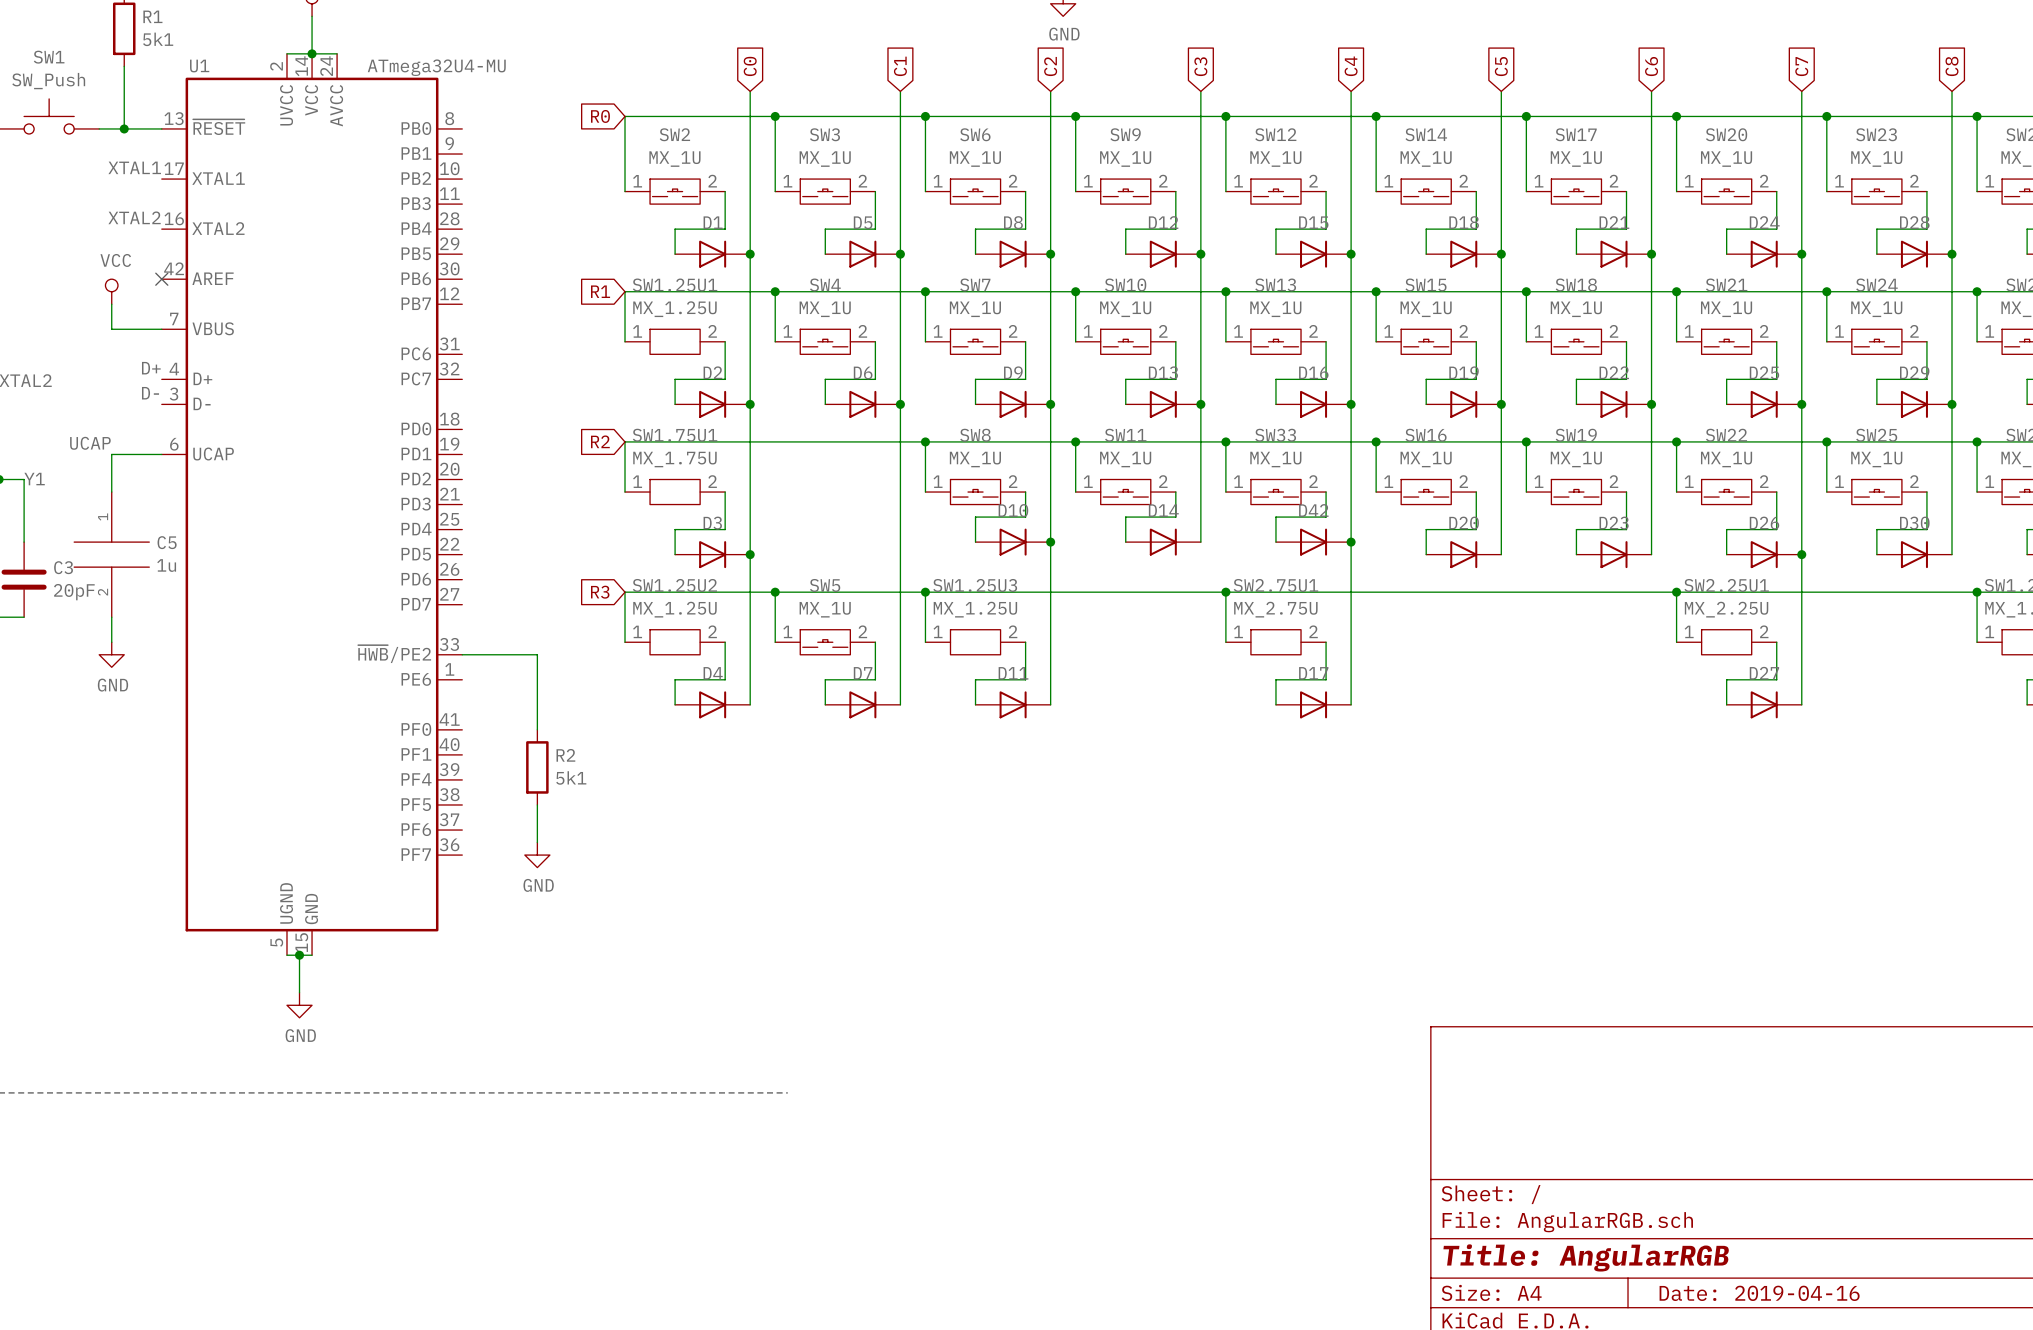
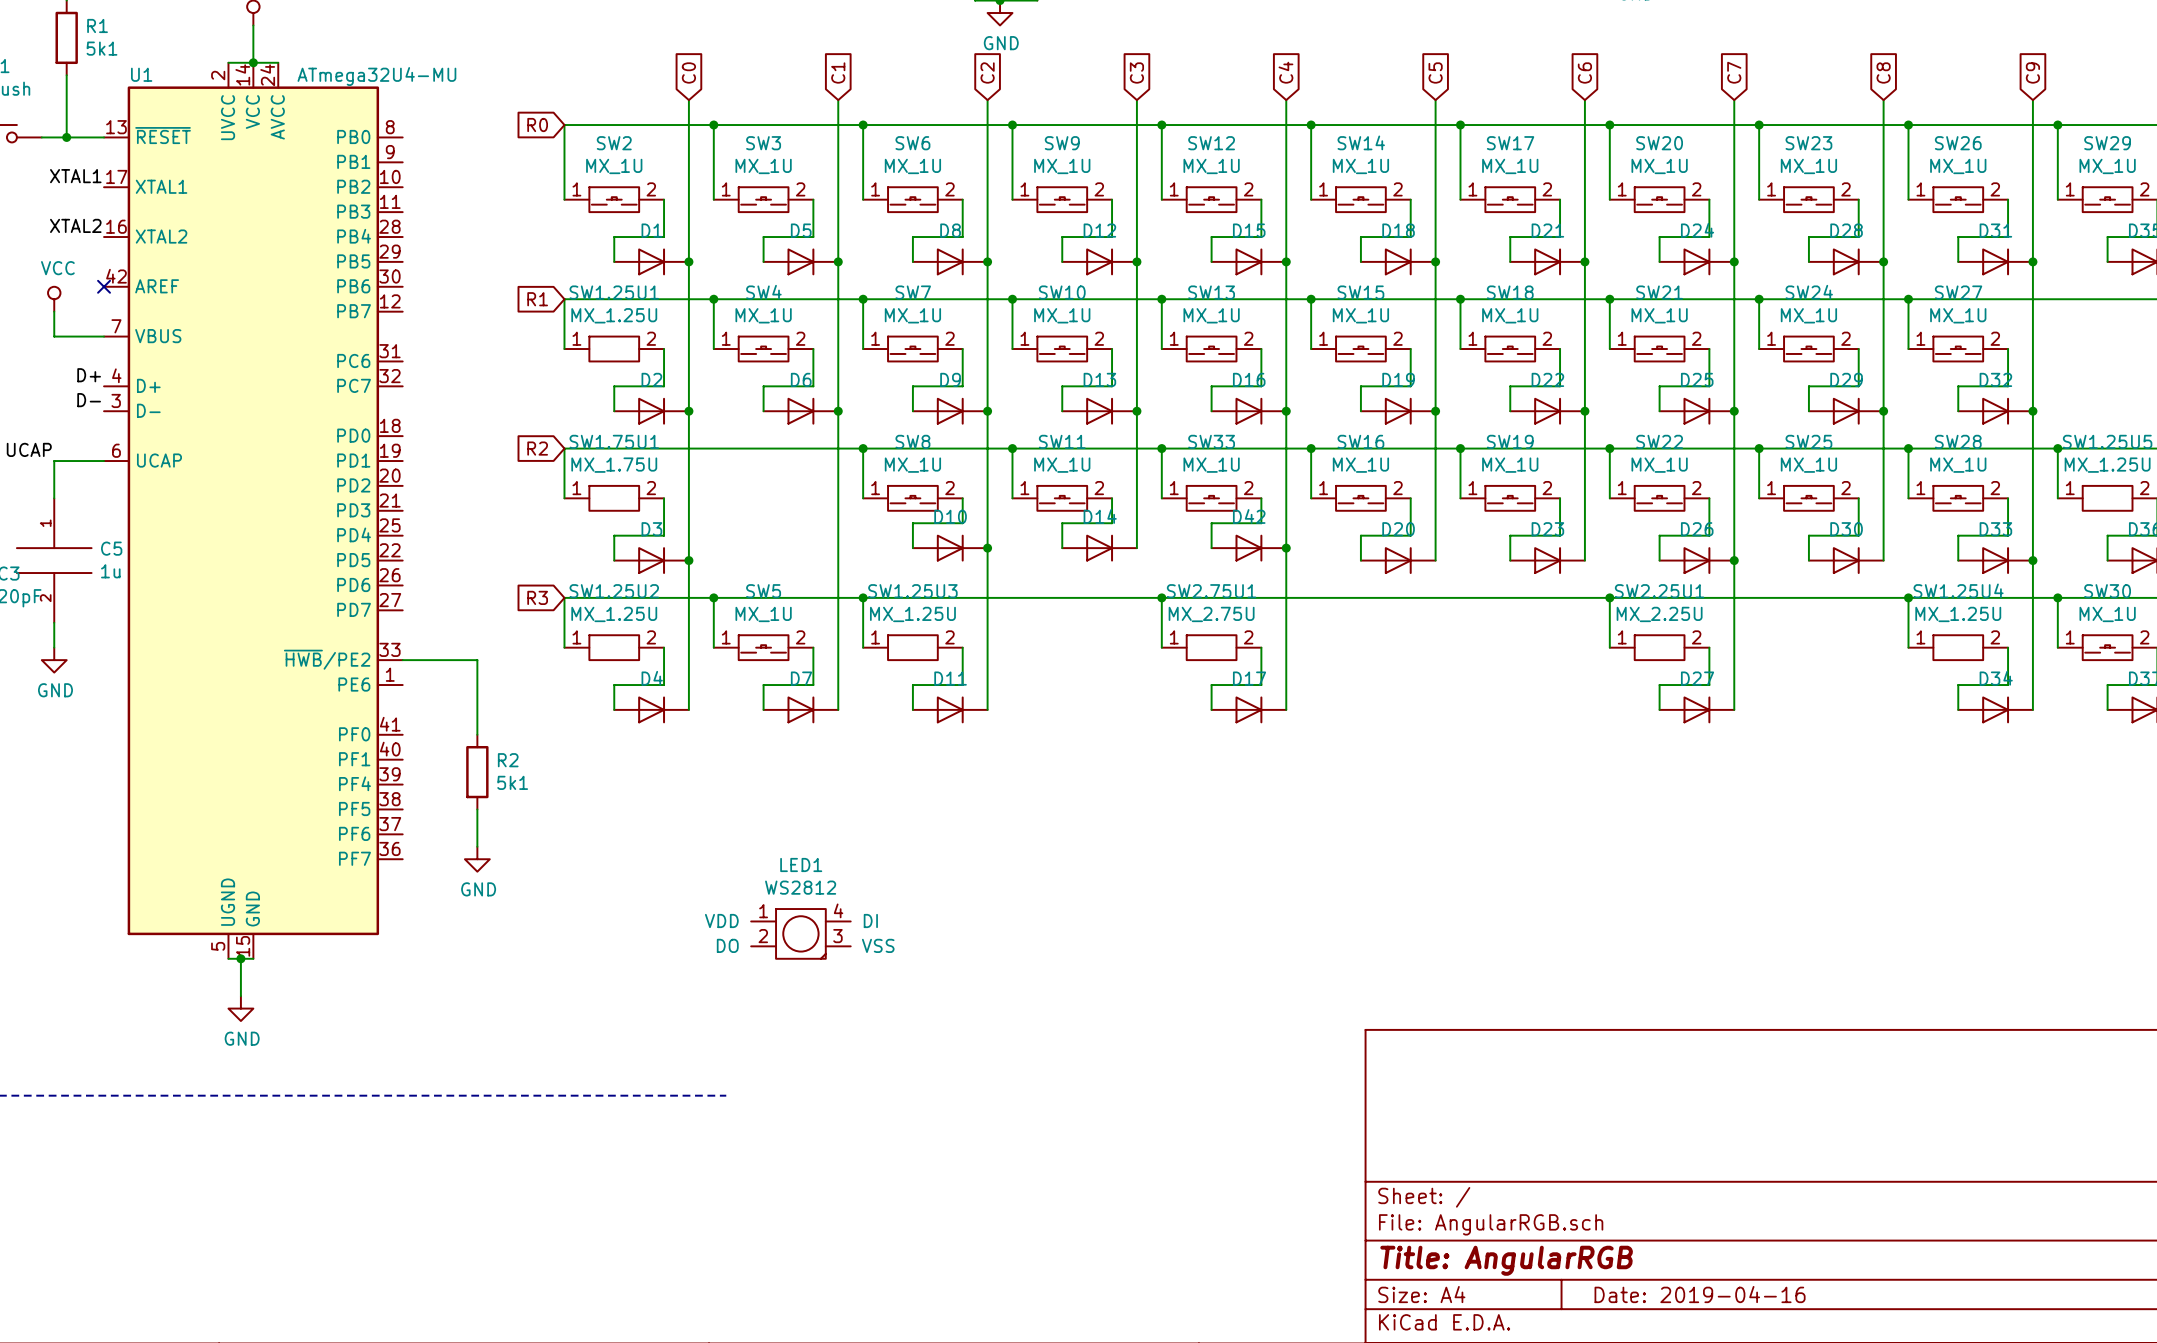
LED1: none -> WS2812 (800, 933)

